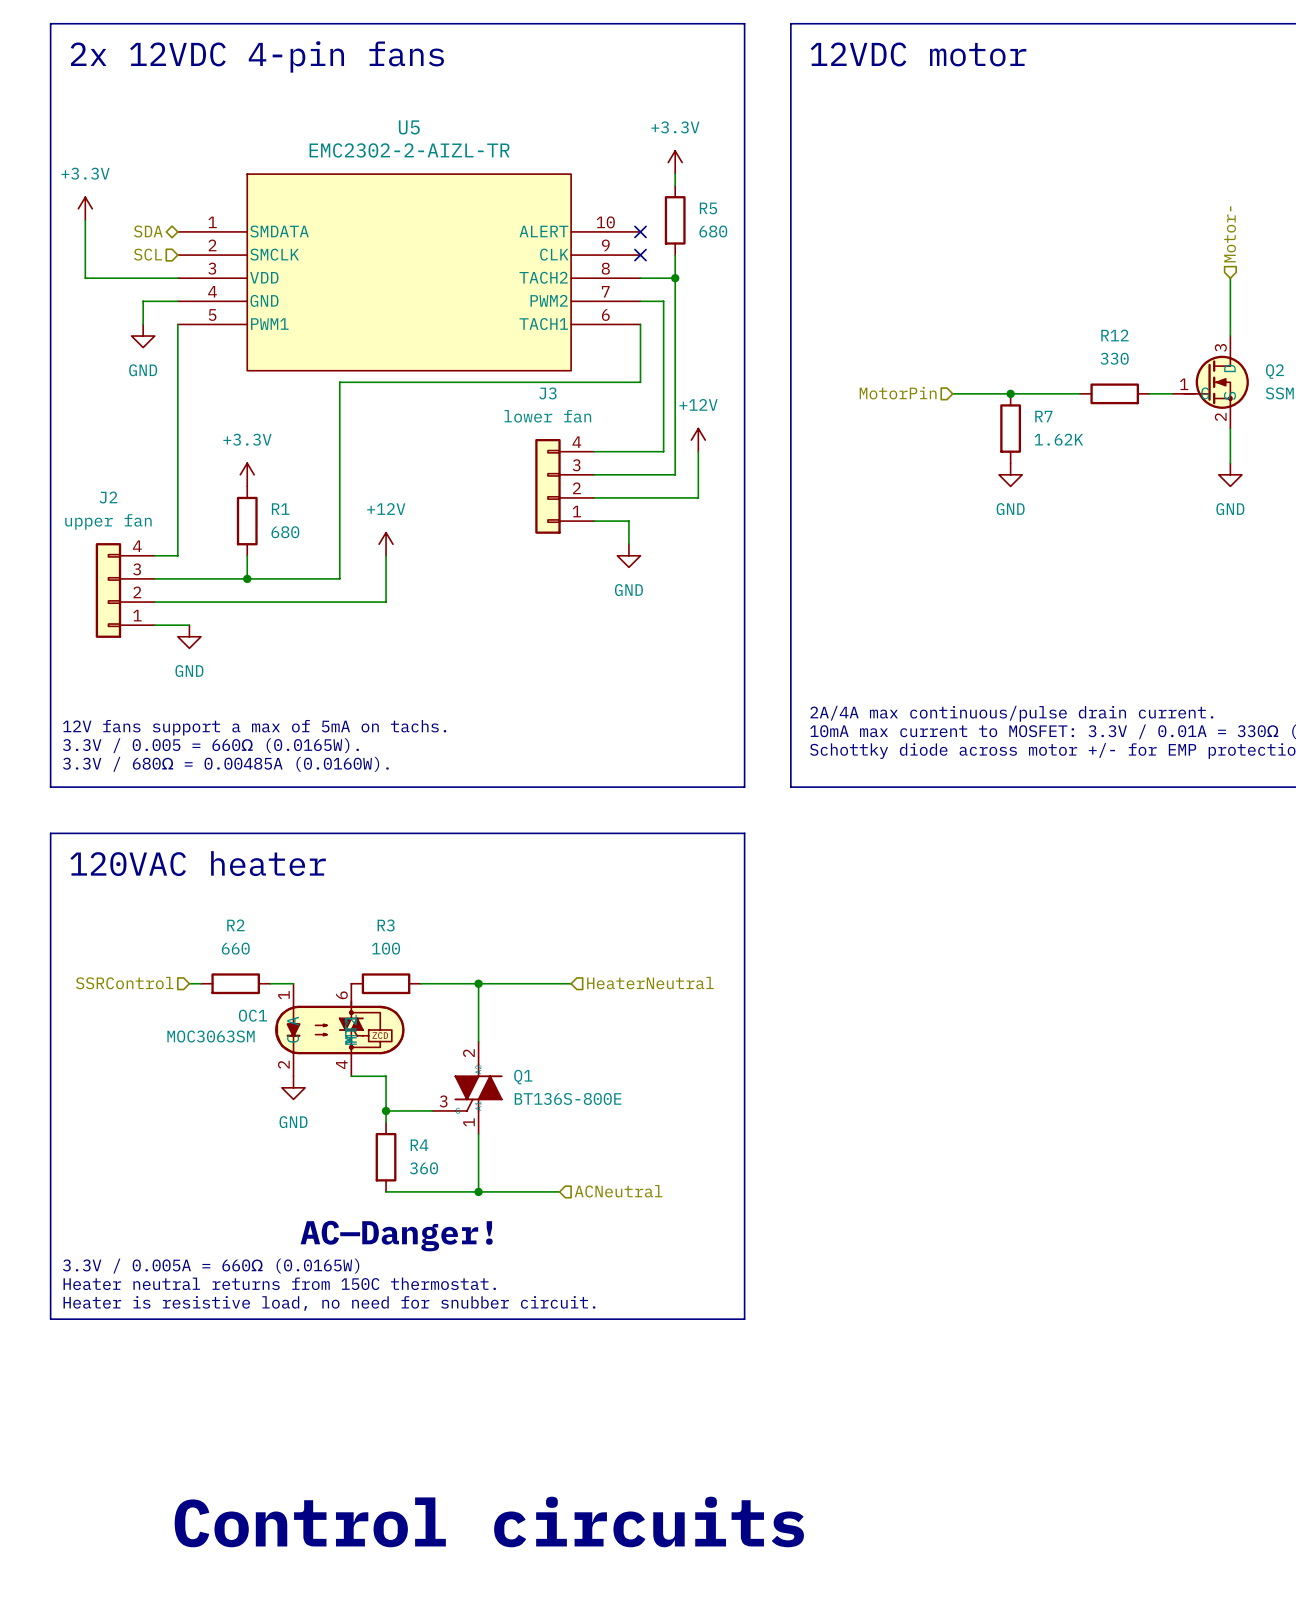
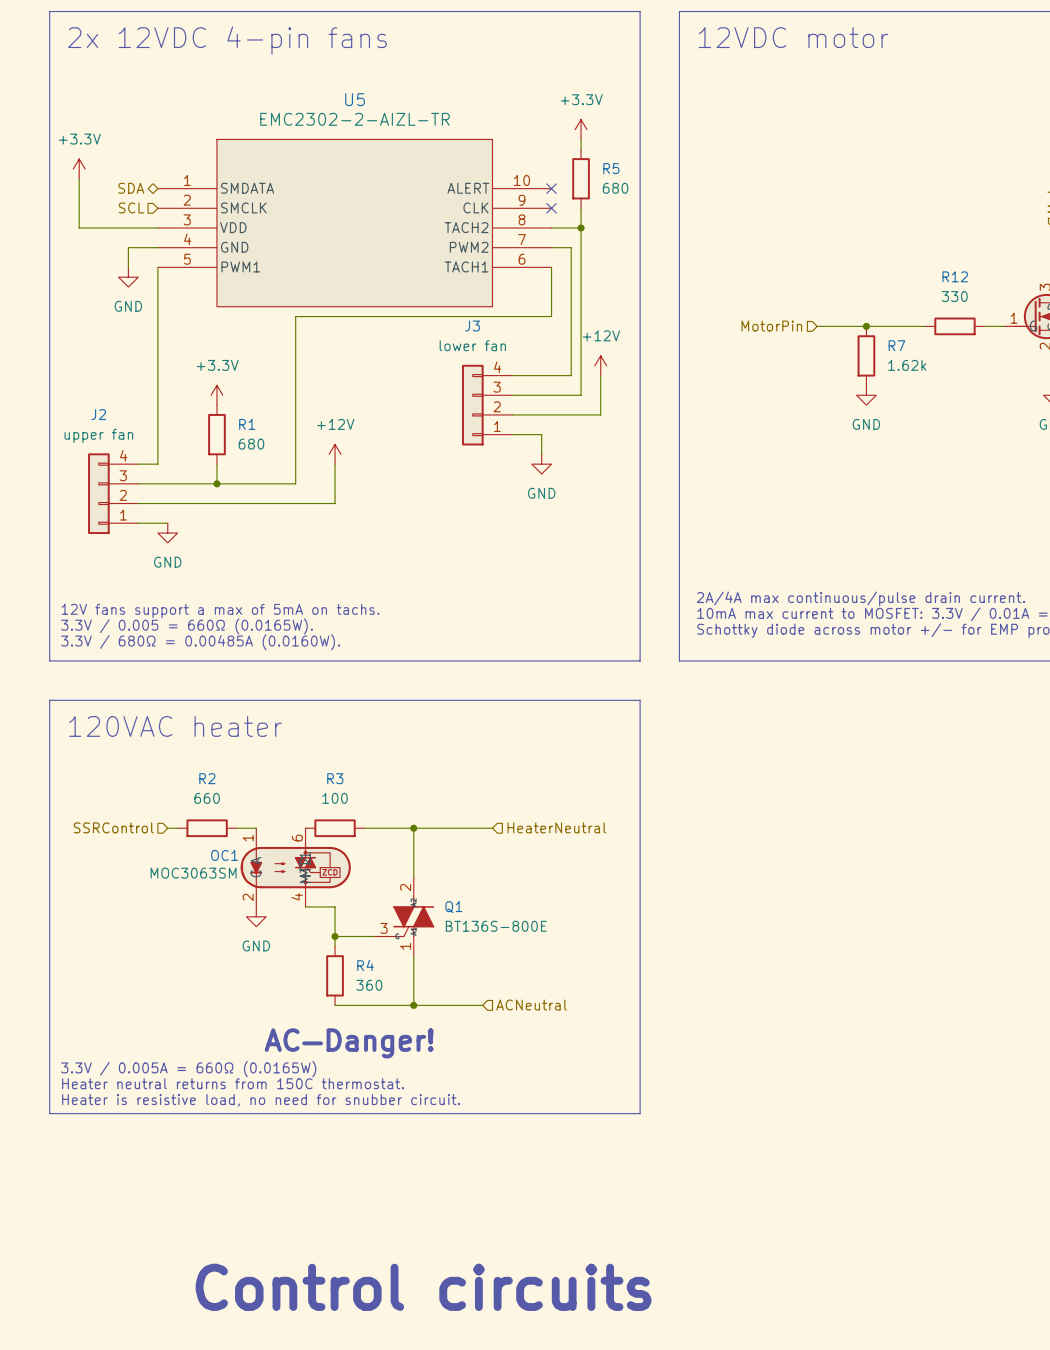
R7 value: 1.62K (1058, 439) -> 1.62k (907, 365)

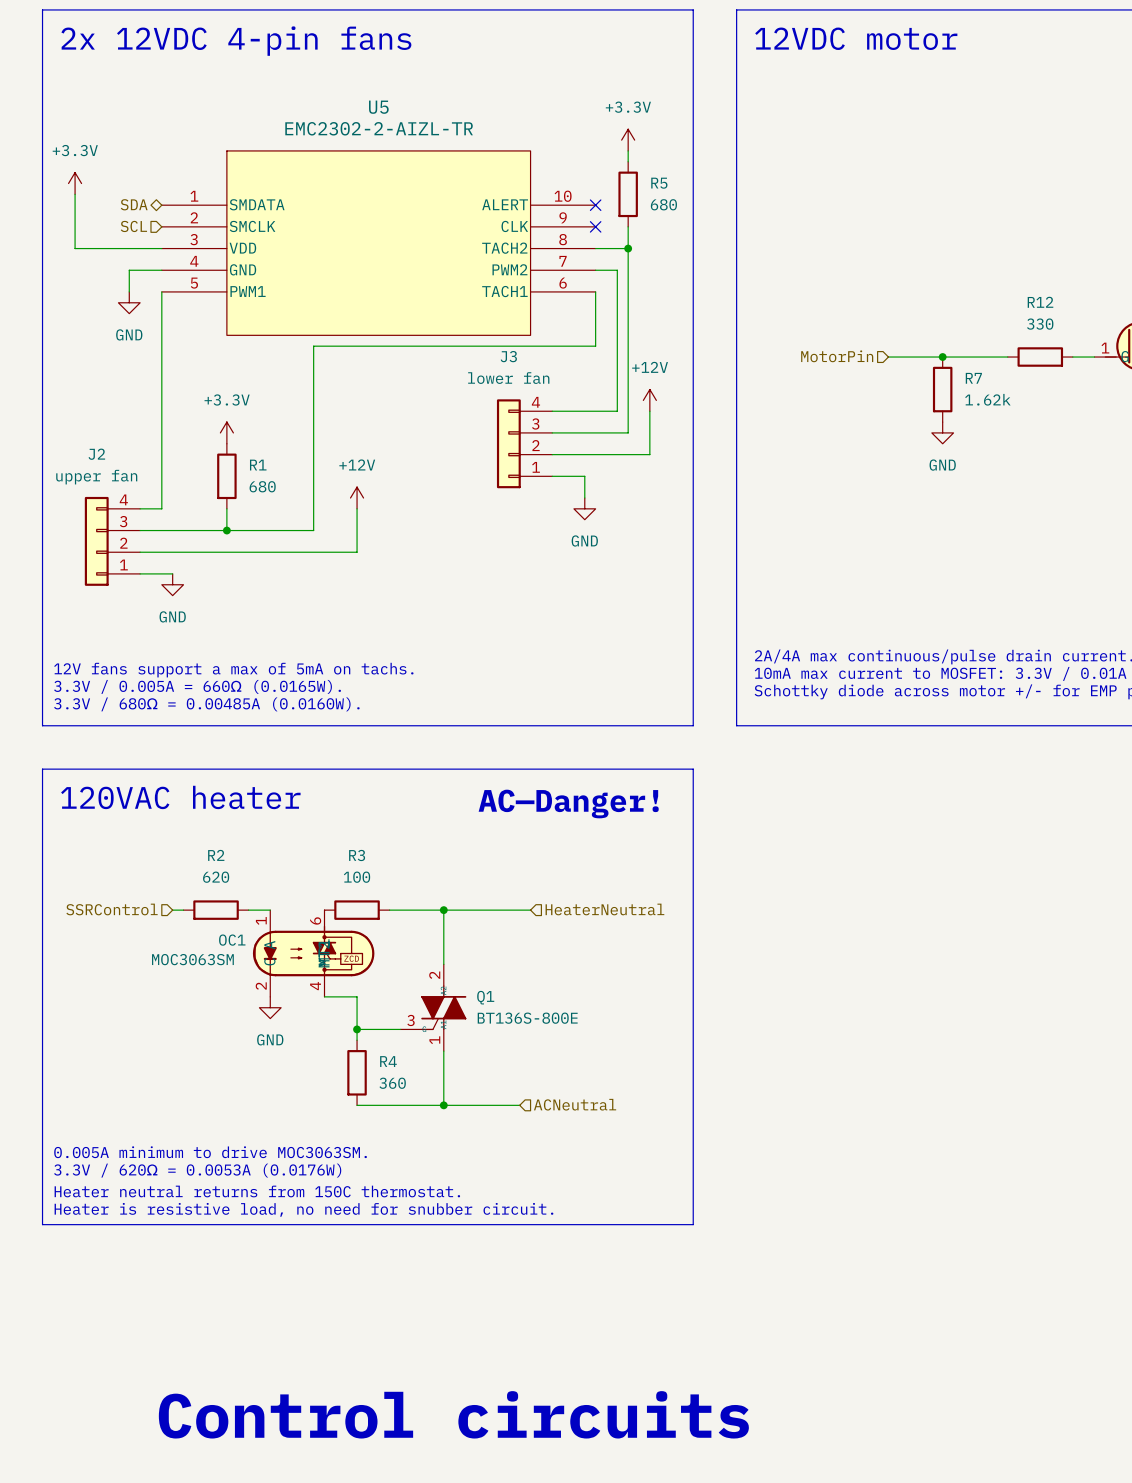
text: 3.3V / 0.005 = 660Ω (0.0165W). (187, 626) -> 3.3V / 0.005A = 660Ω (0.0165W). (197, 686)
text: none -> AC—Danger! (568, 804)
R2 value: 660 (207, 798) -> 620 (216, 877)
text: AC—Danger! (349, 1043) -> none
text: none -> 0.005A minimum to drive MOC3063SM. (210, 1152)
text: 3.3V / 0.005A = 660Ω (0.0165W) (188, 1069) -> 3.3V / 620Ω = 0.0053A (0.0176W) (197, 1170)

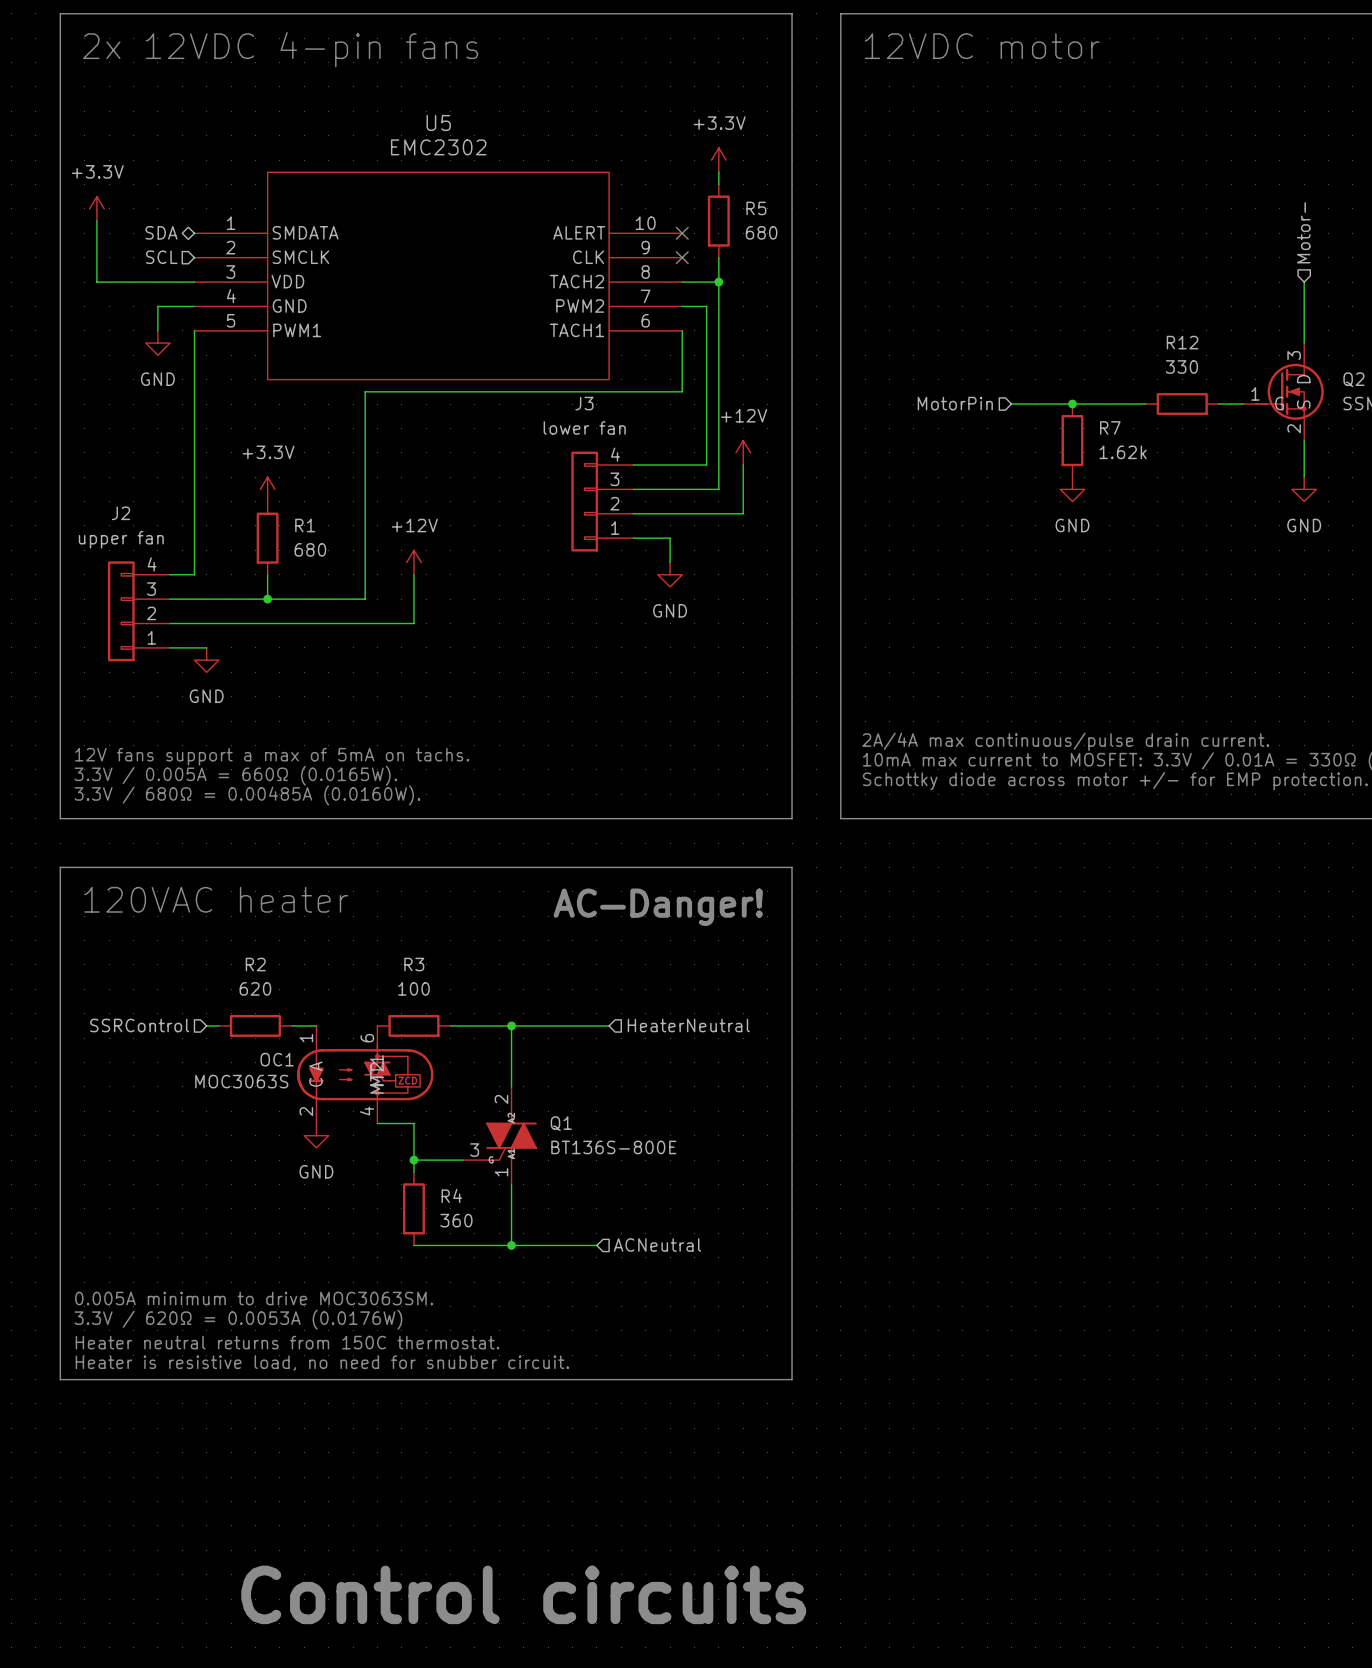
U5 value: EMC2302-2-AIZL-TR (379, 128) -> EMC2302 (438, 147)
OC1 value: MOC3063SM (192, 959) -> MOC3063S (241, 1081)

